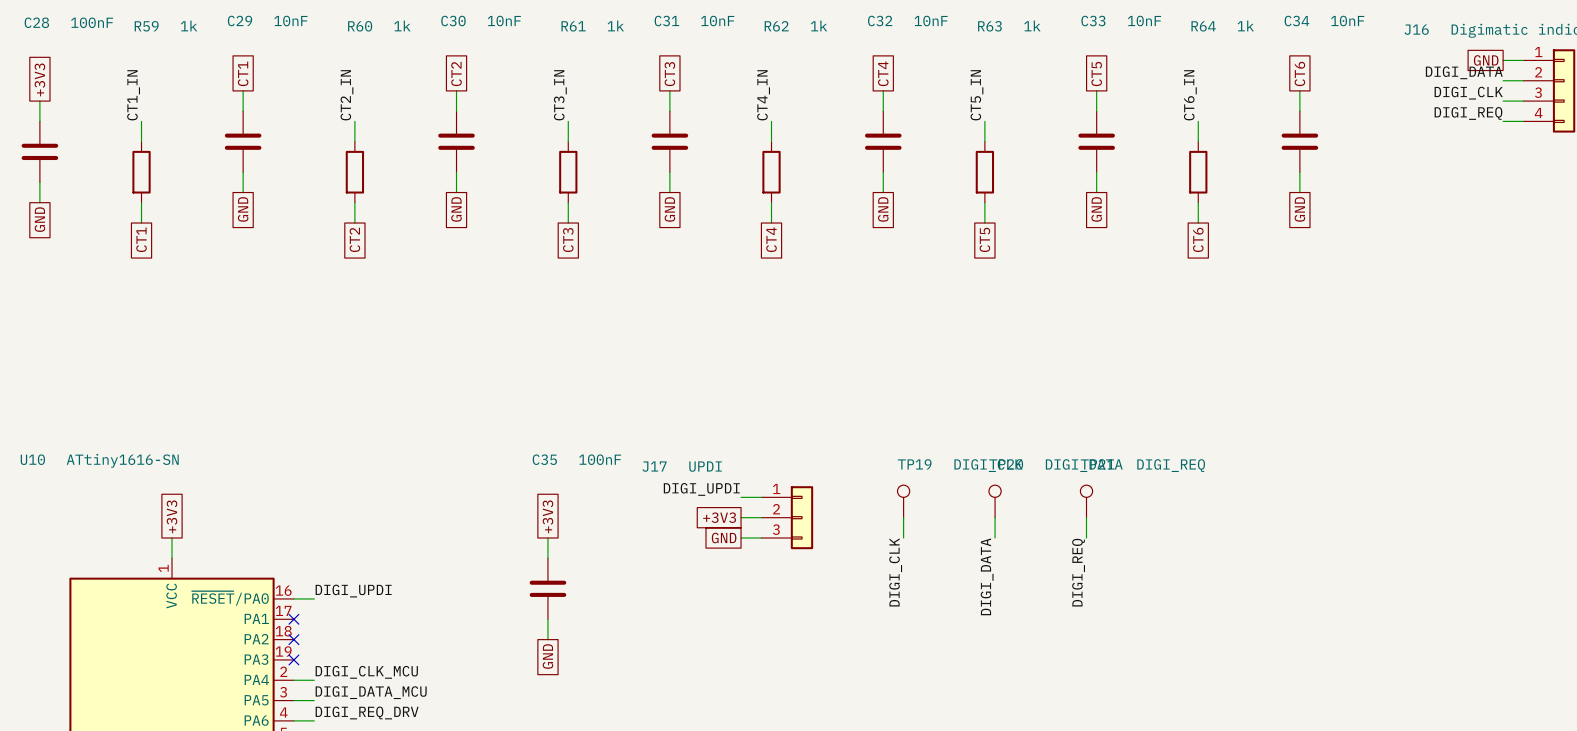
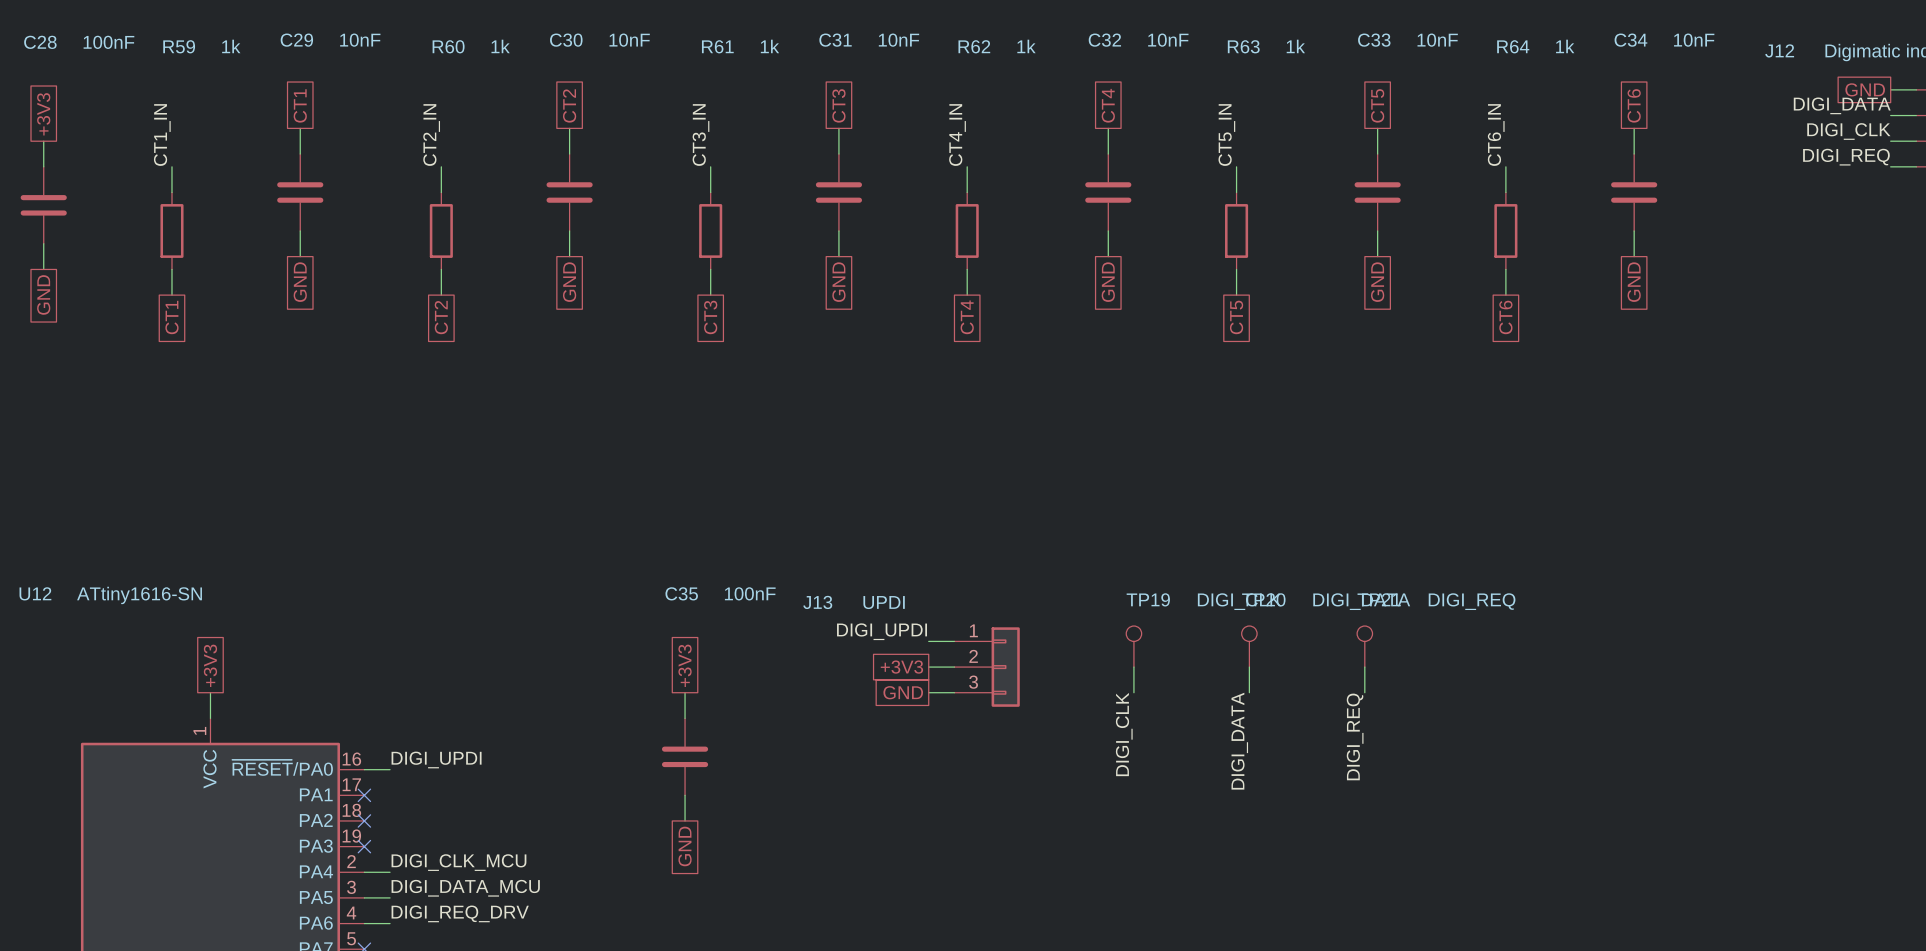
J16 name: J16 (1416, 29) -> J12 (1779, 50)
U10 name: U10 (32, 459) -> U12 (35, 593)
J17 name: J17 (654, 466) -> J13 (817, 602)

